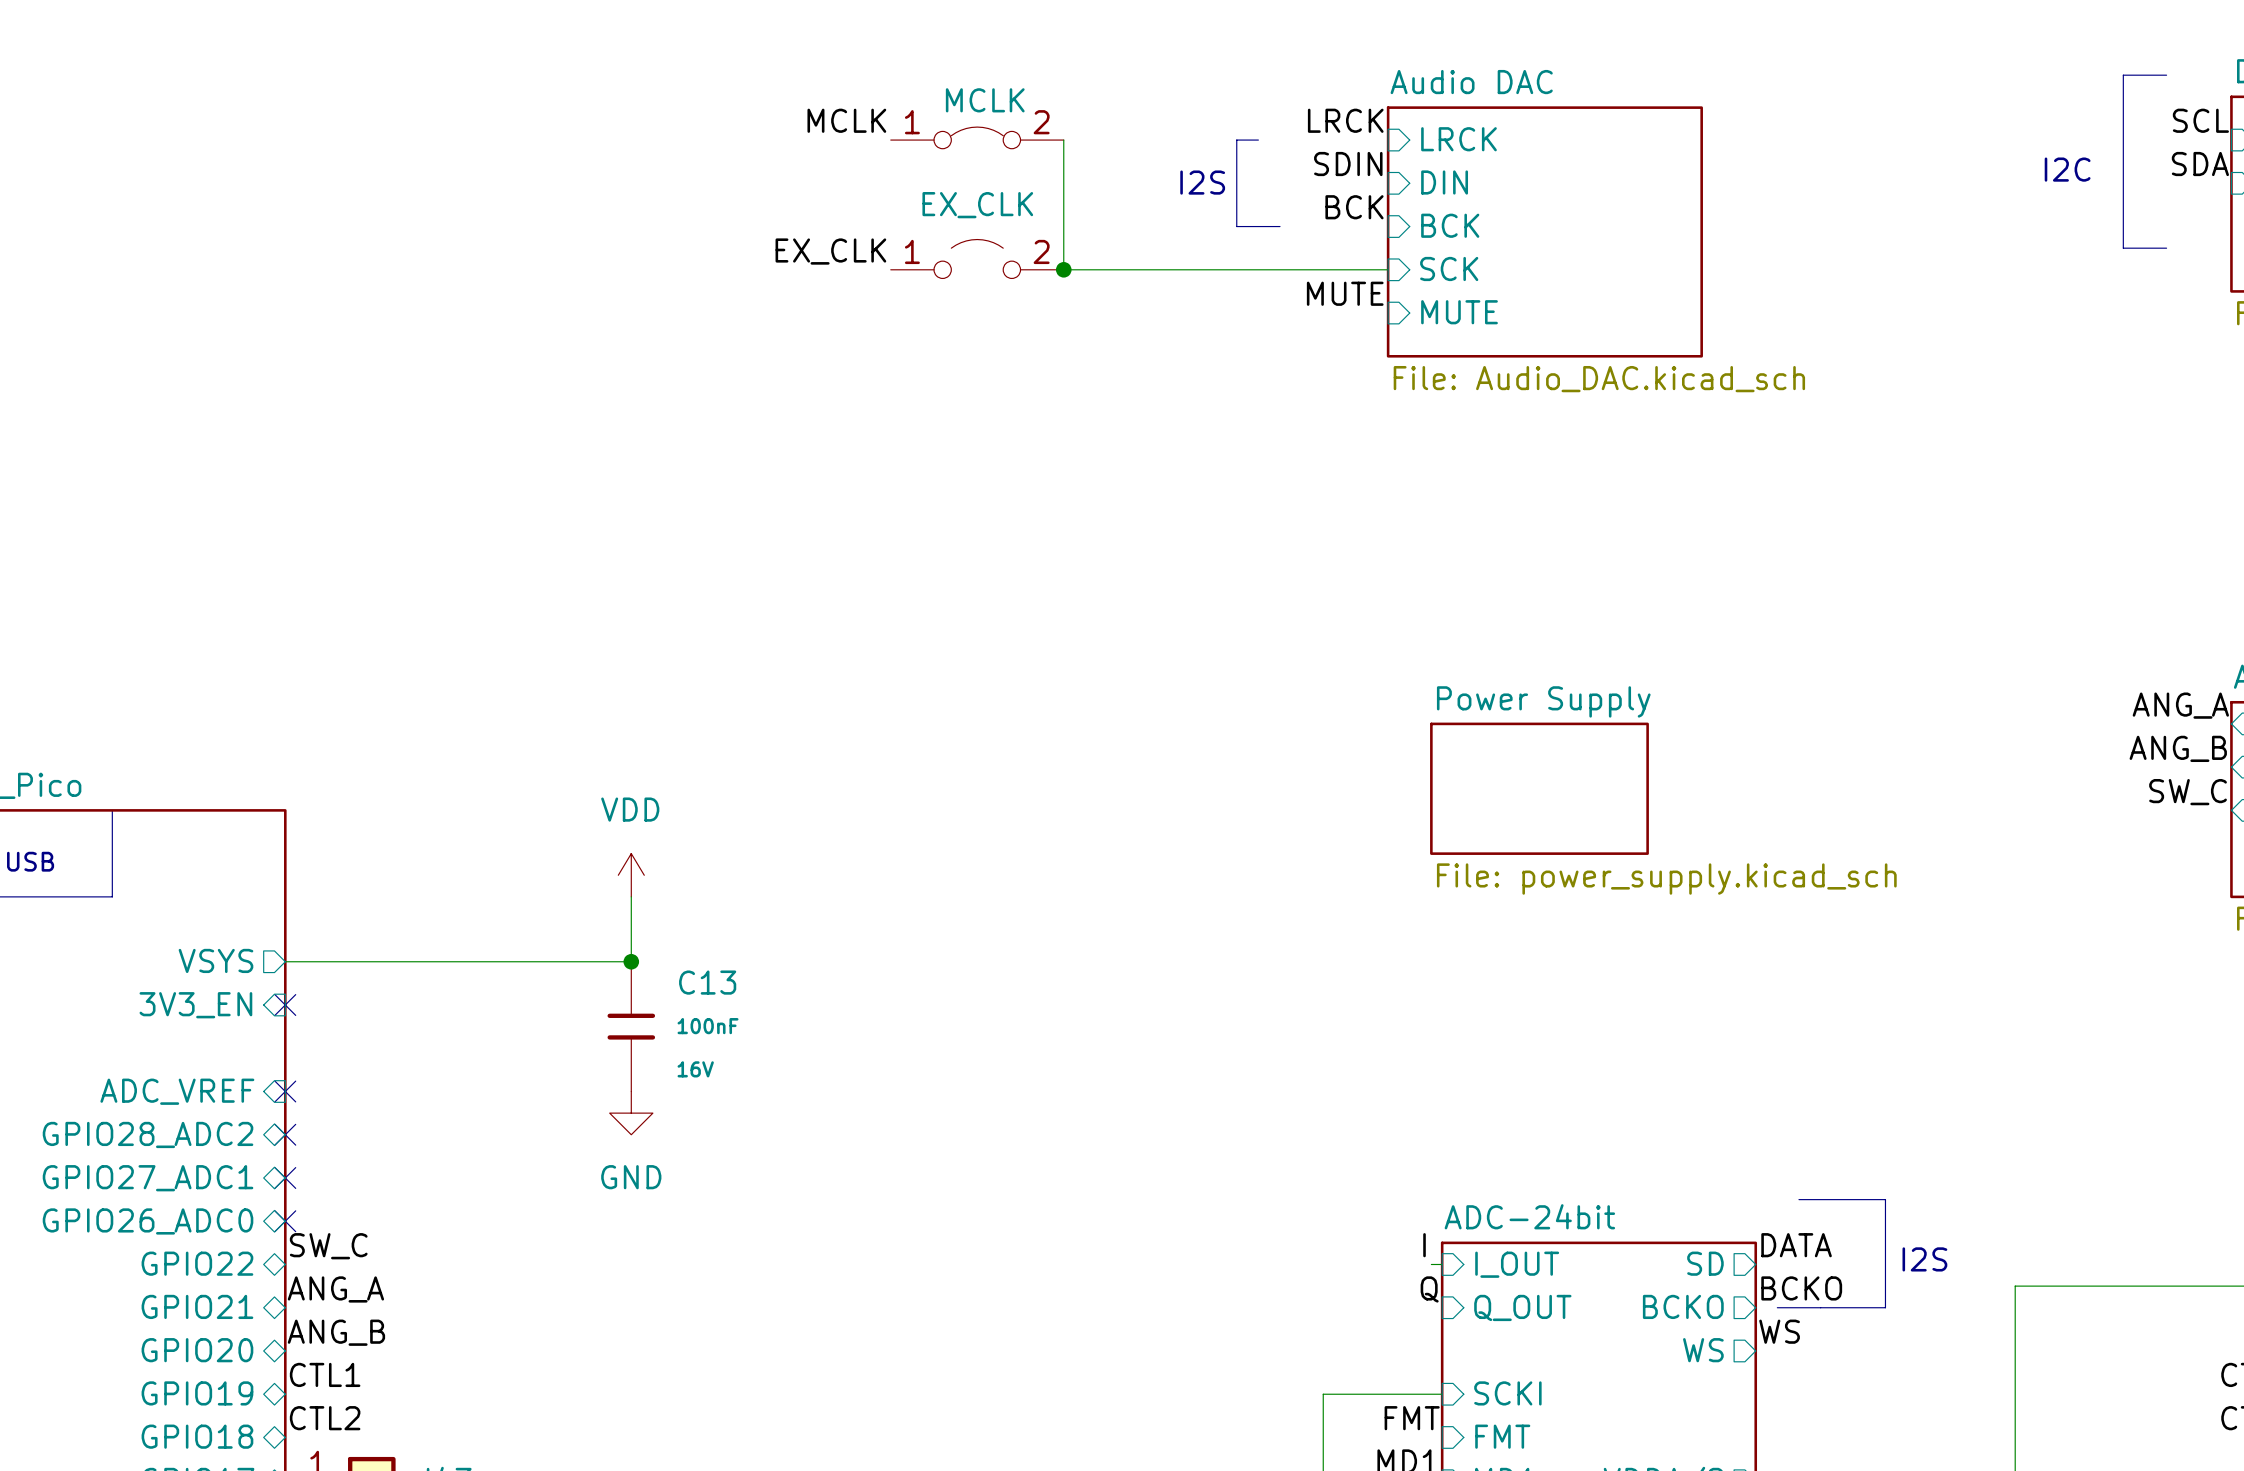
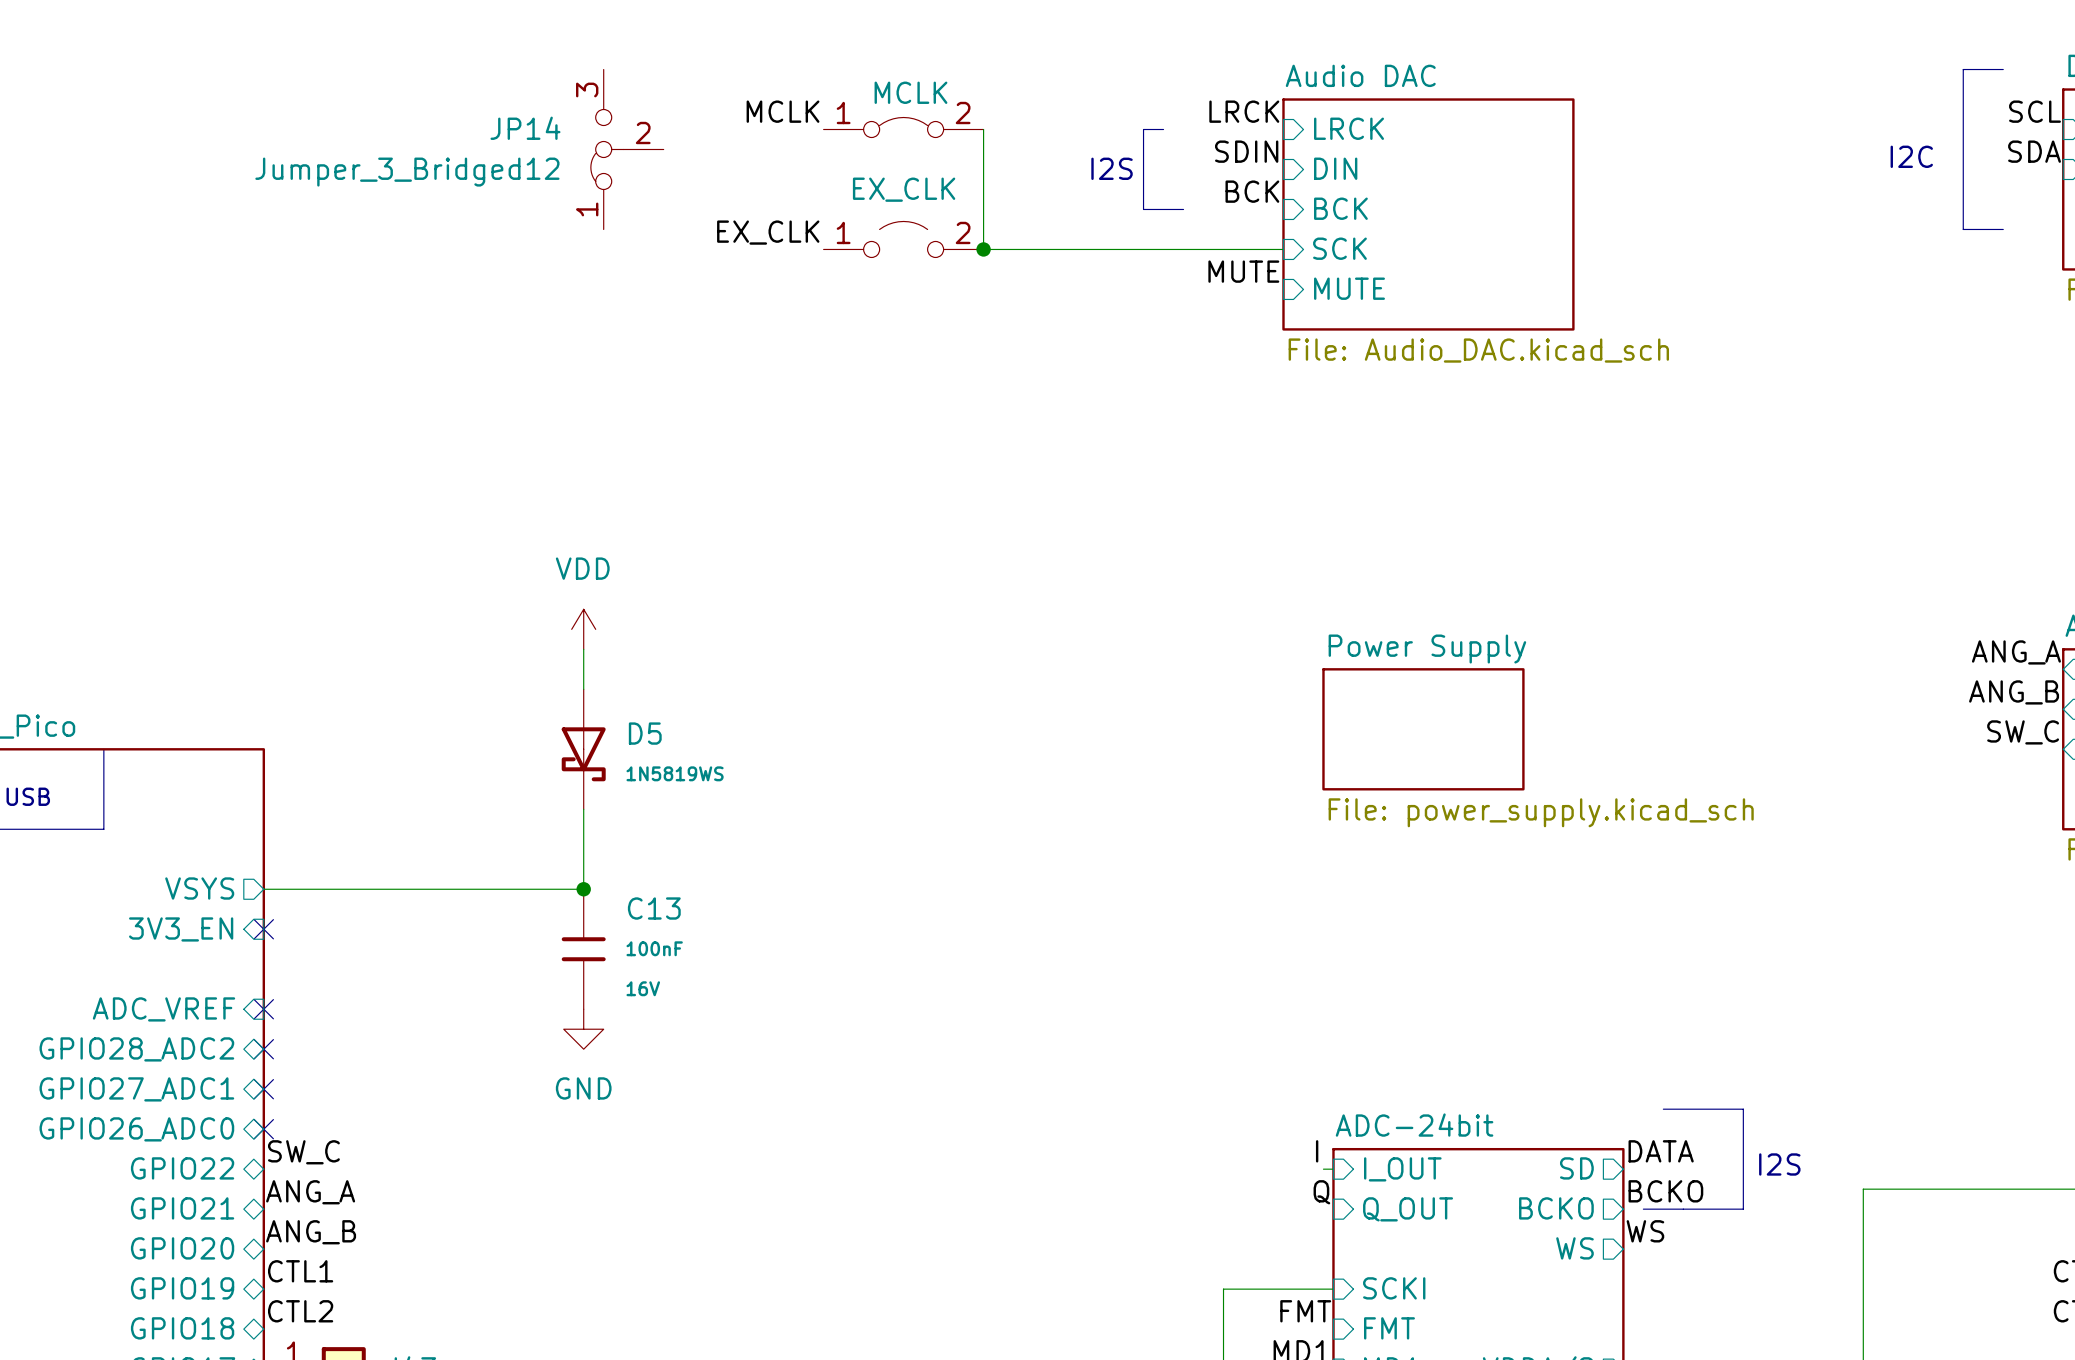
JP14: none -> Jumper_3_Bridged12 (627, 149)
wire: none -> (583, 649) (583, 689)
D5: none -> 1N5819WS (583, 749)
power symbol position: VDD (631, 875) -> VDD (583, 629)

